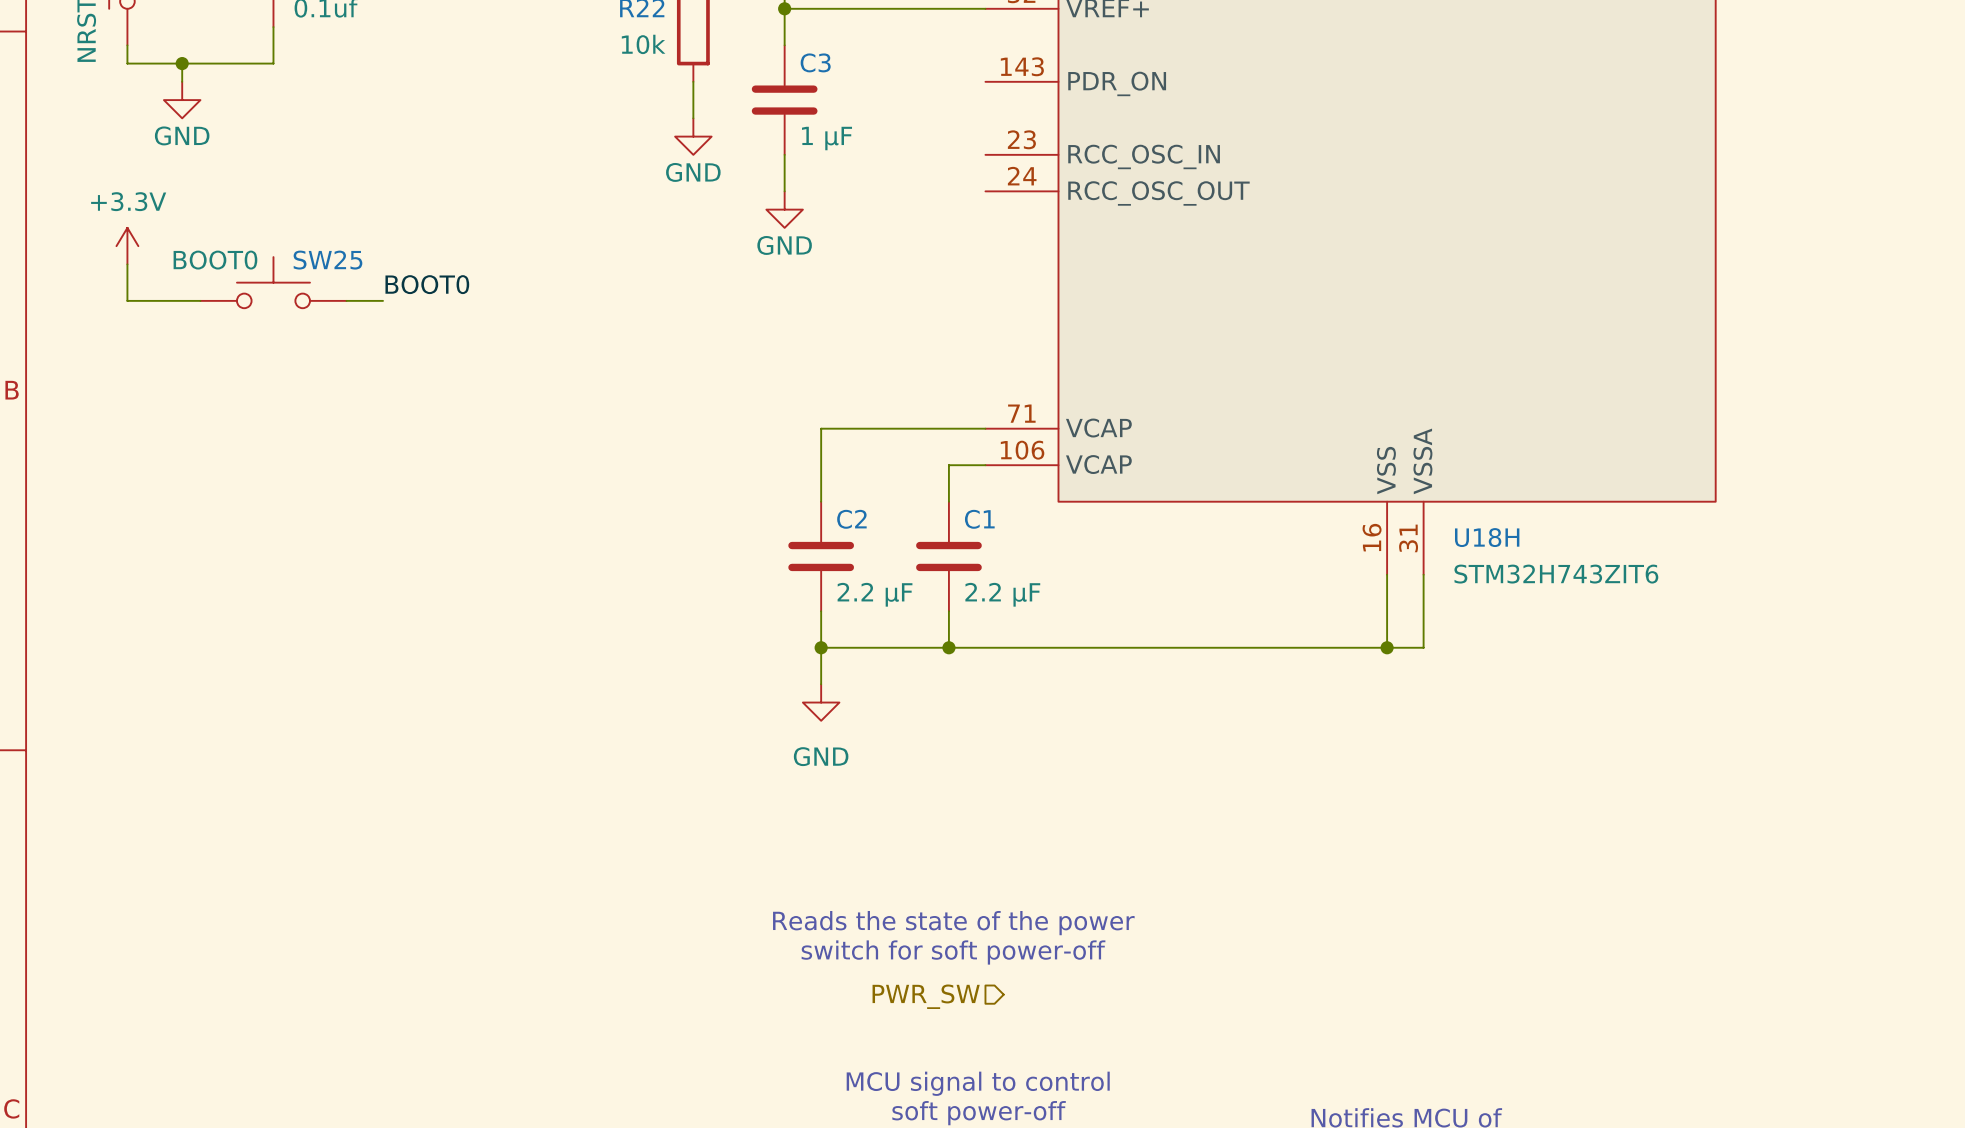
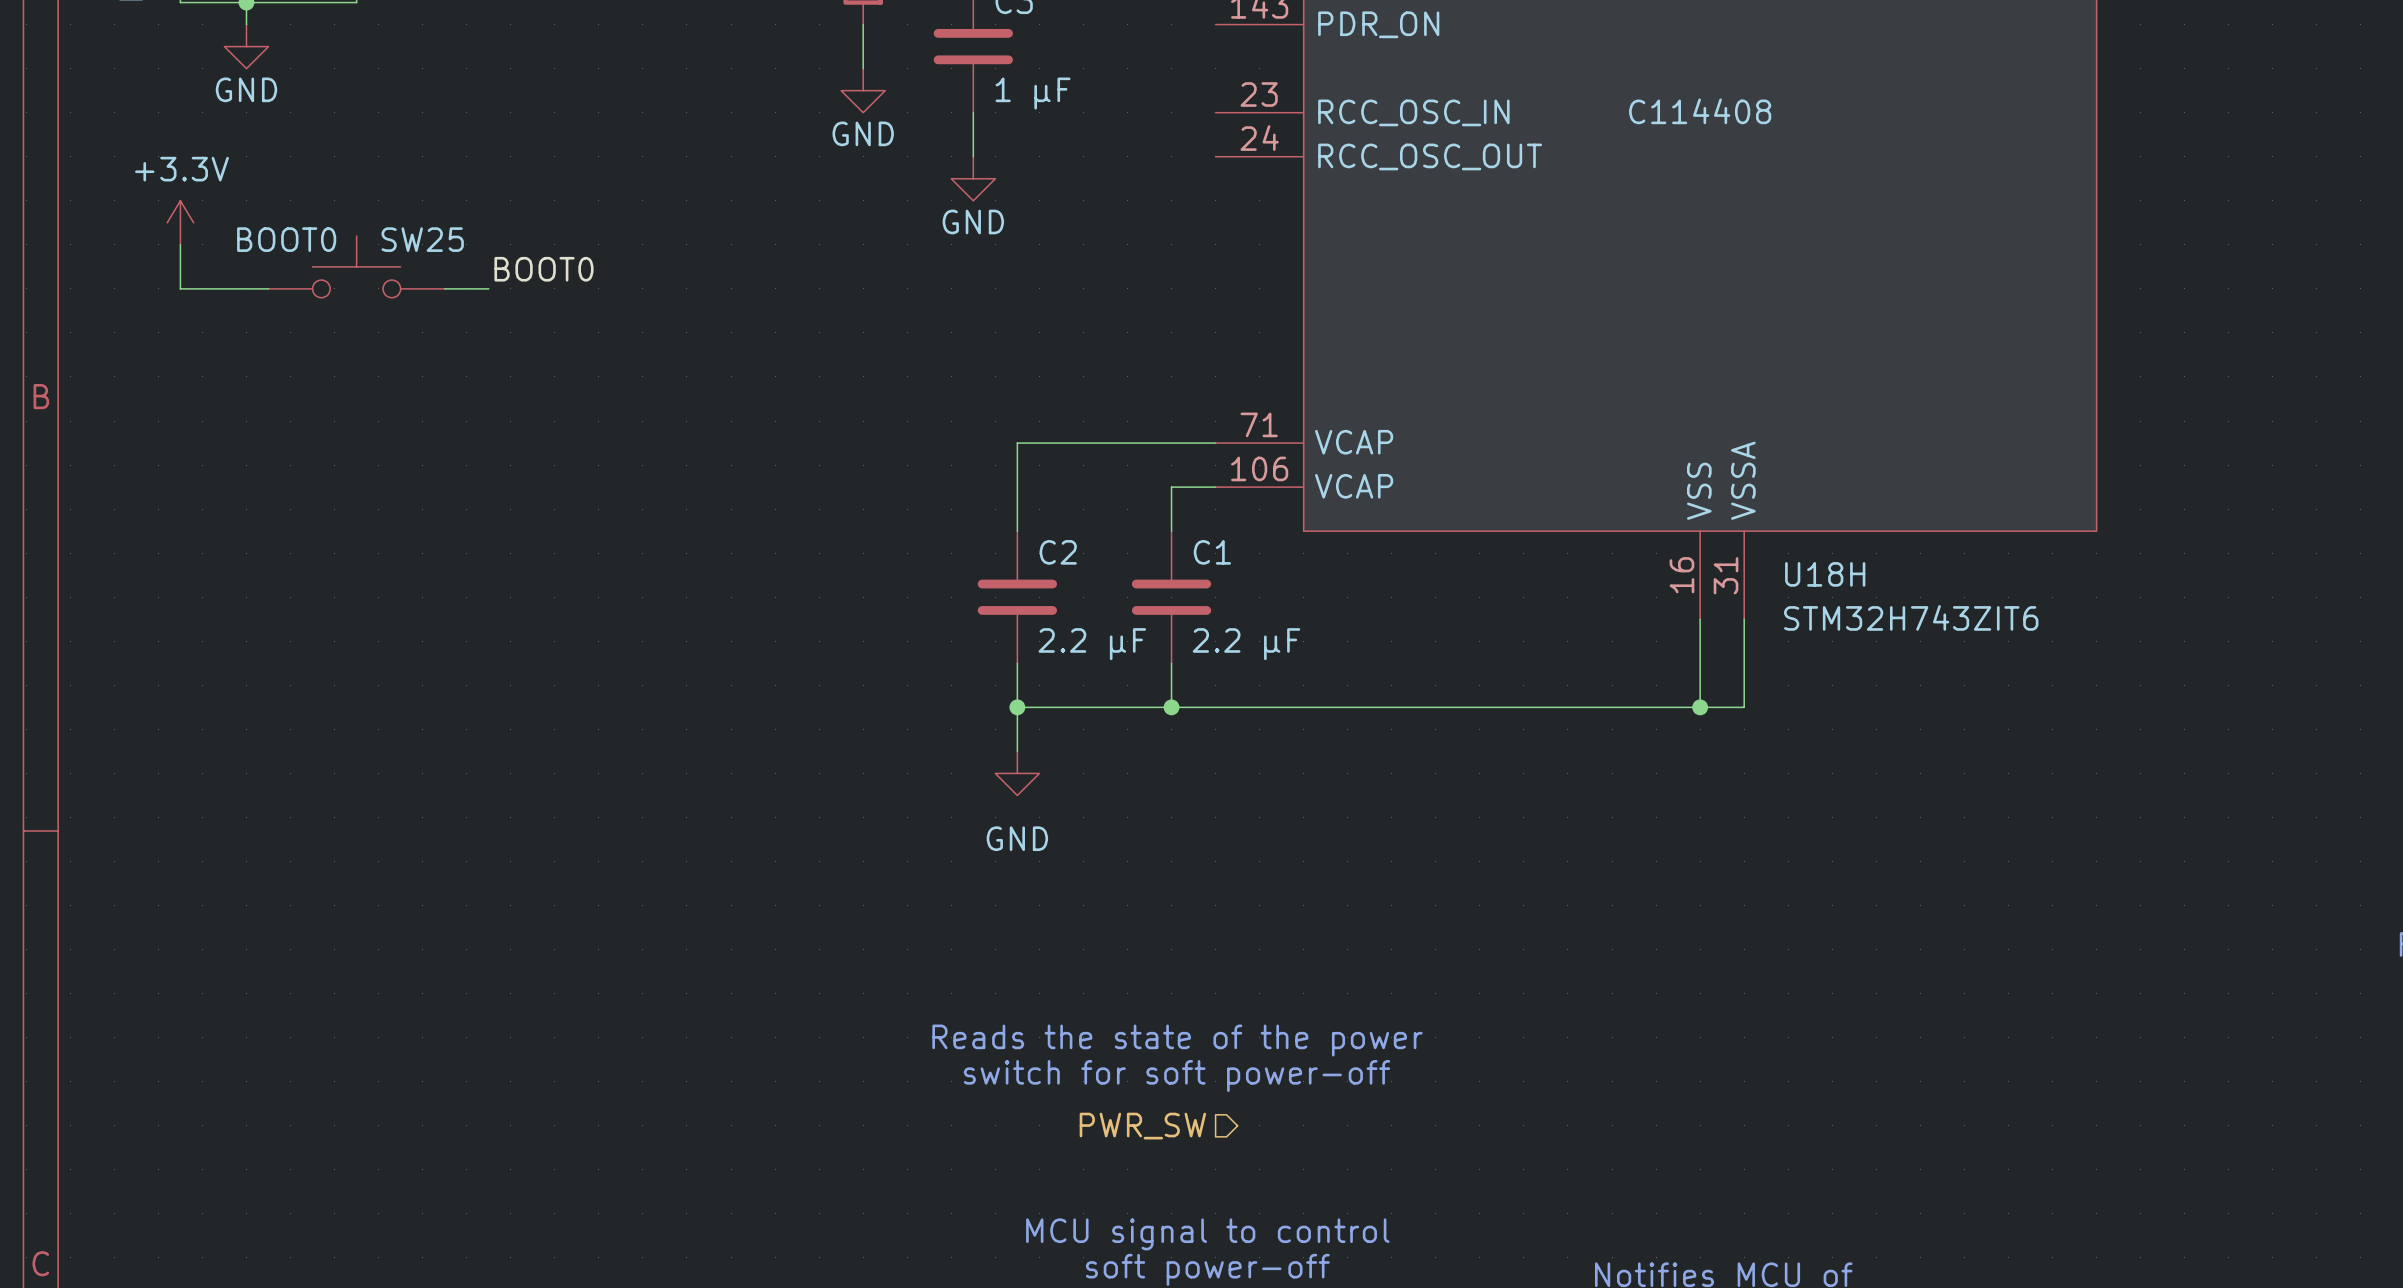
U18H text: none -> C114408 (1700, 111)

